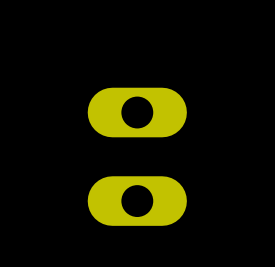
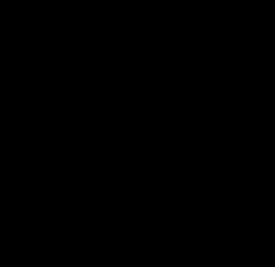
part: (137, 156) -> none

